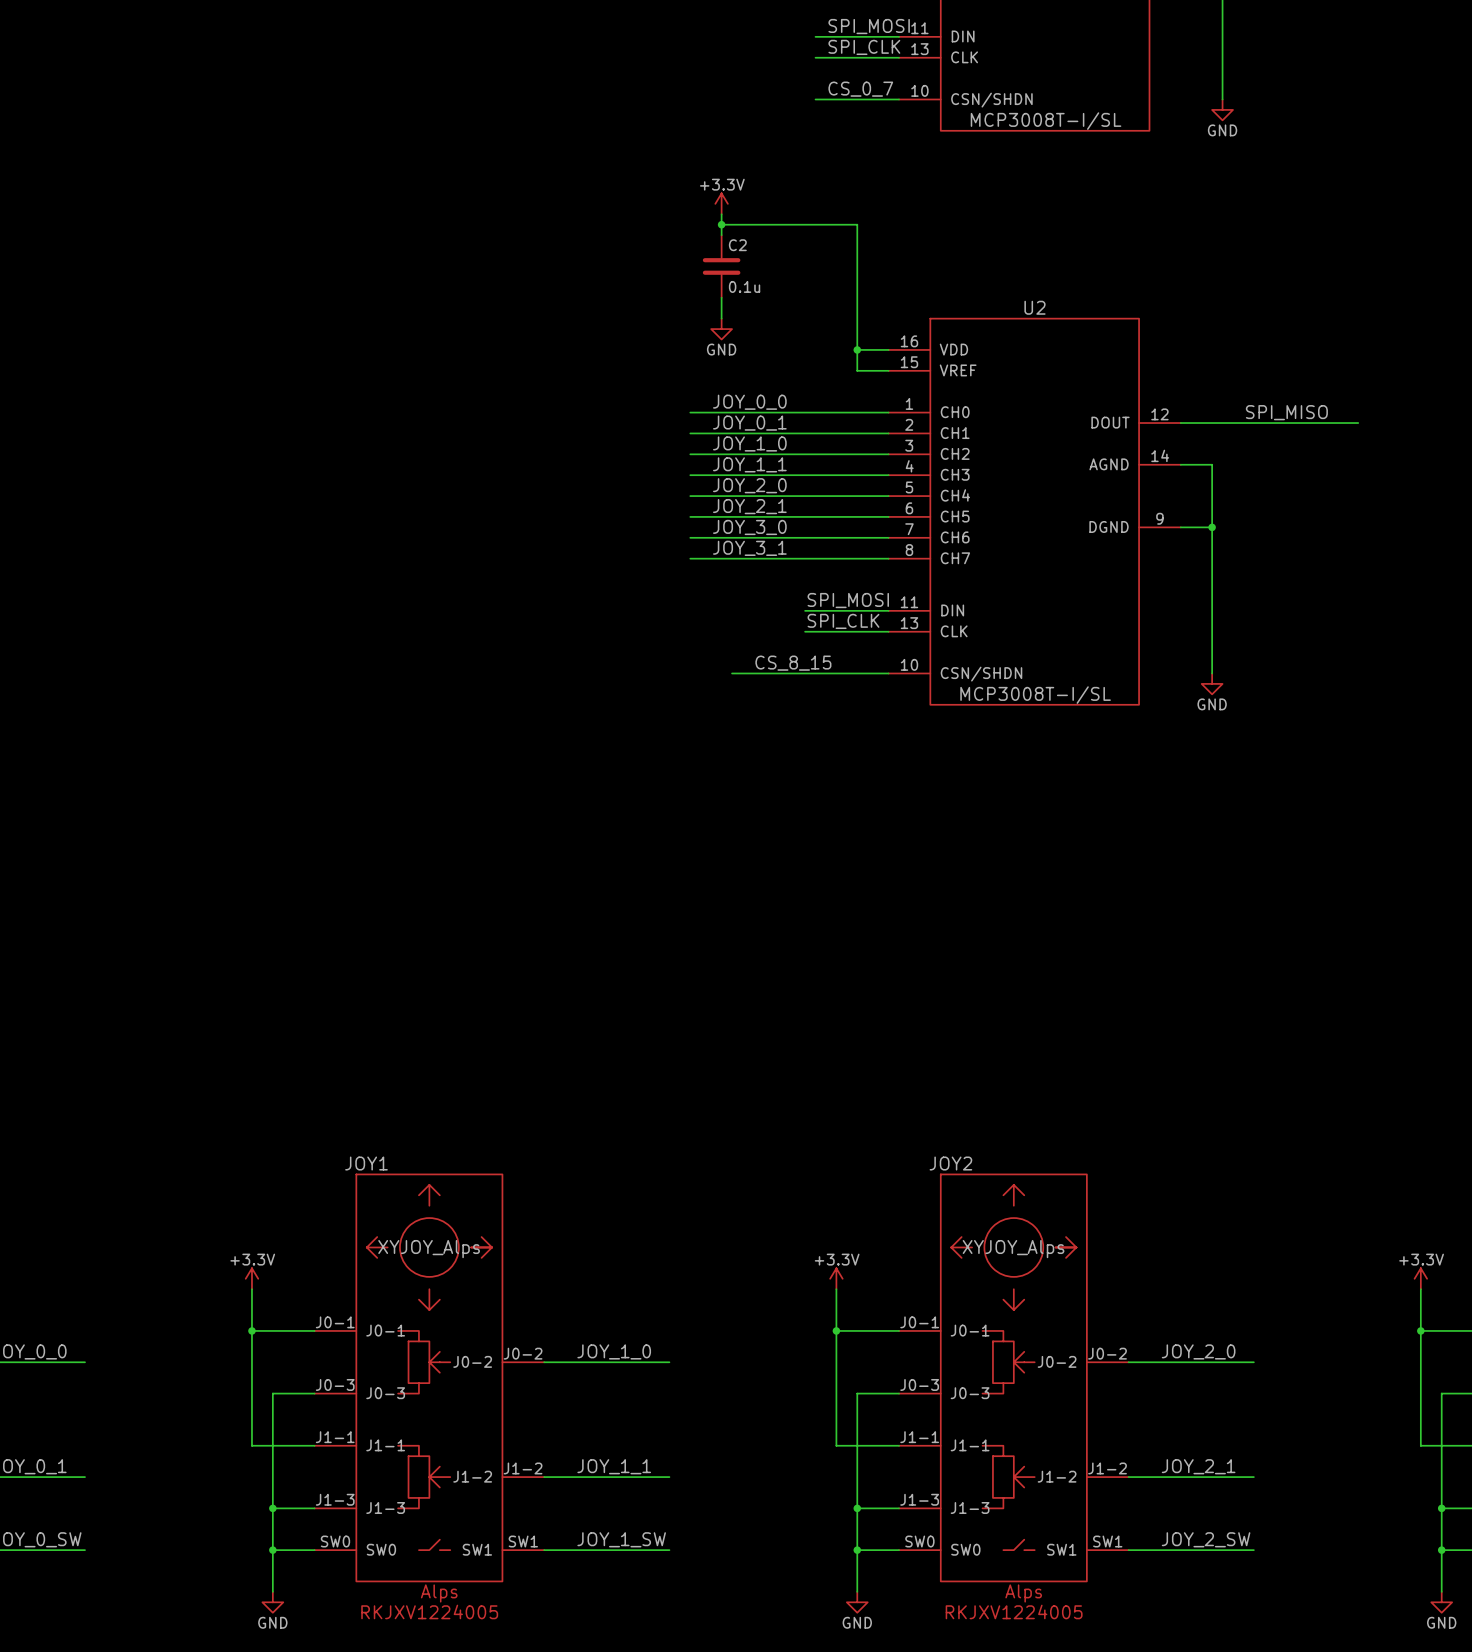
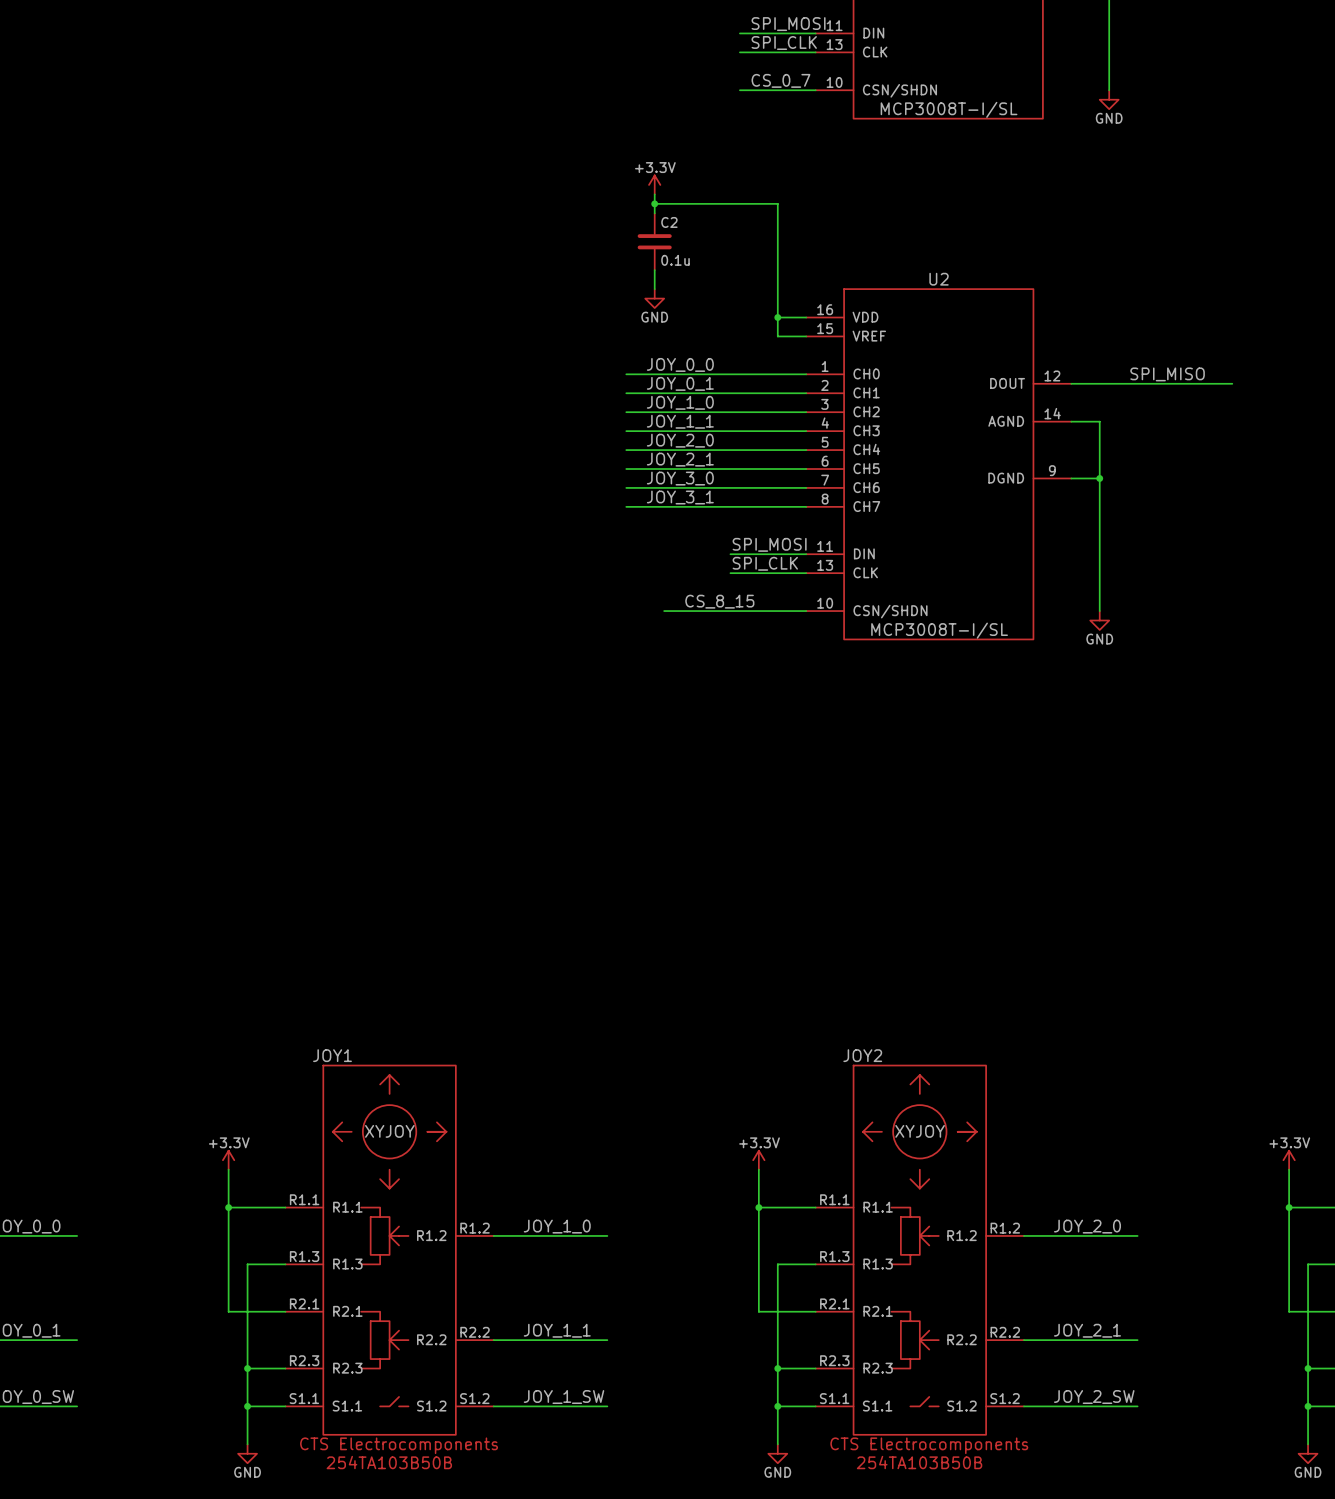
JOY1 symbol: [314, 1174, 545, 1582] -> [285, 1065, 494, 1435]
JOY2 symbol: [899, 1174, 1129, 1582] -> [815, 1065, 1024, 1435]
JOY1 value: XYJOY_Alps (429, 1249) -> XYJOY (389, 1131)
JOY2 value: XYJOY_Alps (1013, 1249) -> XYJOY (920, 1131)

